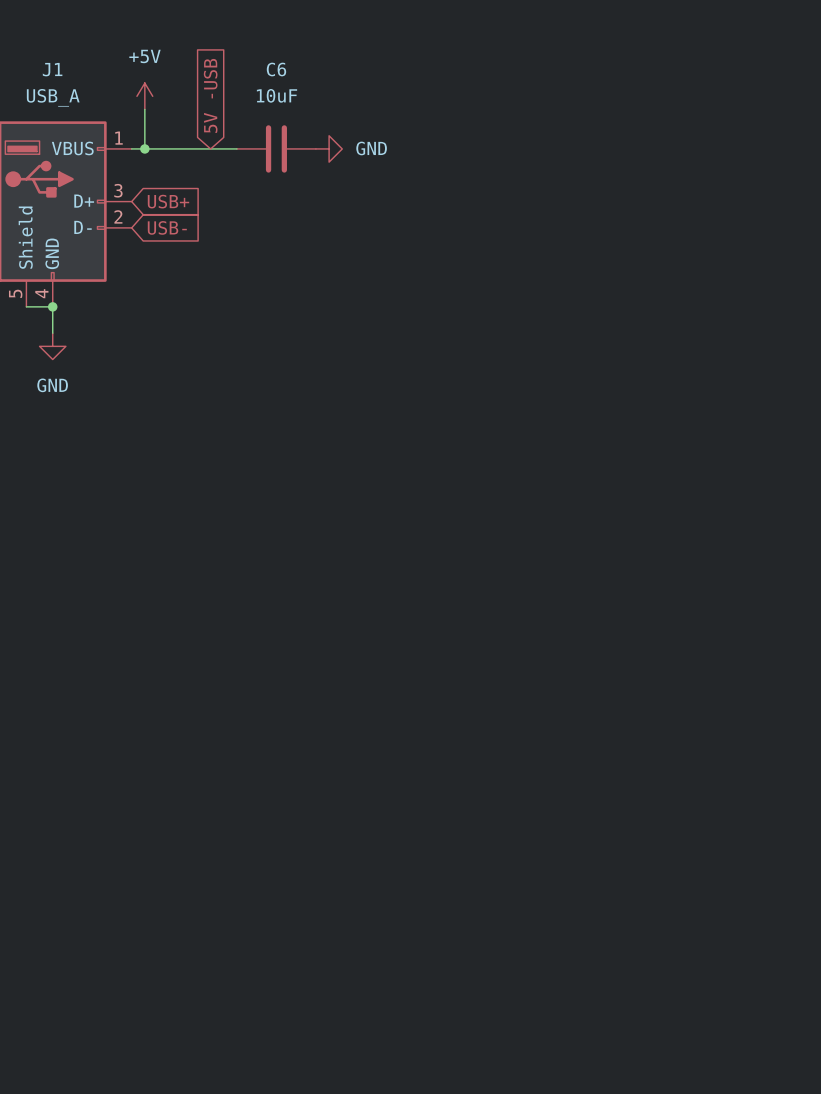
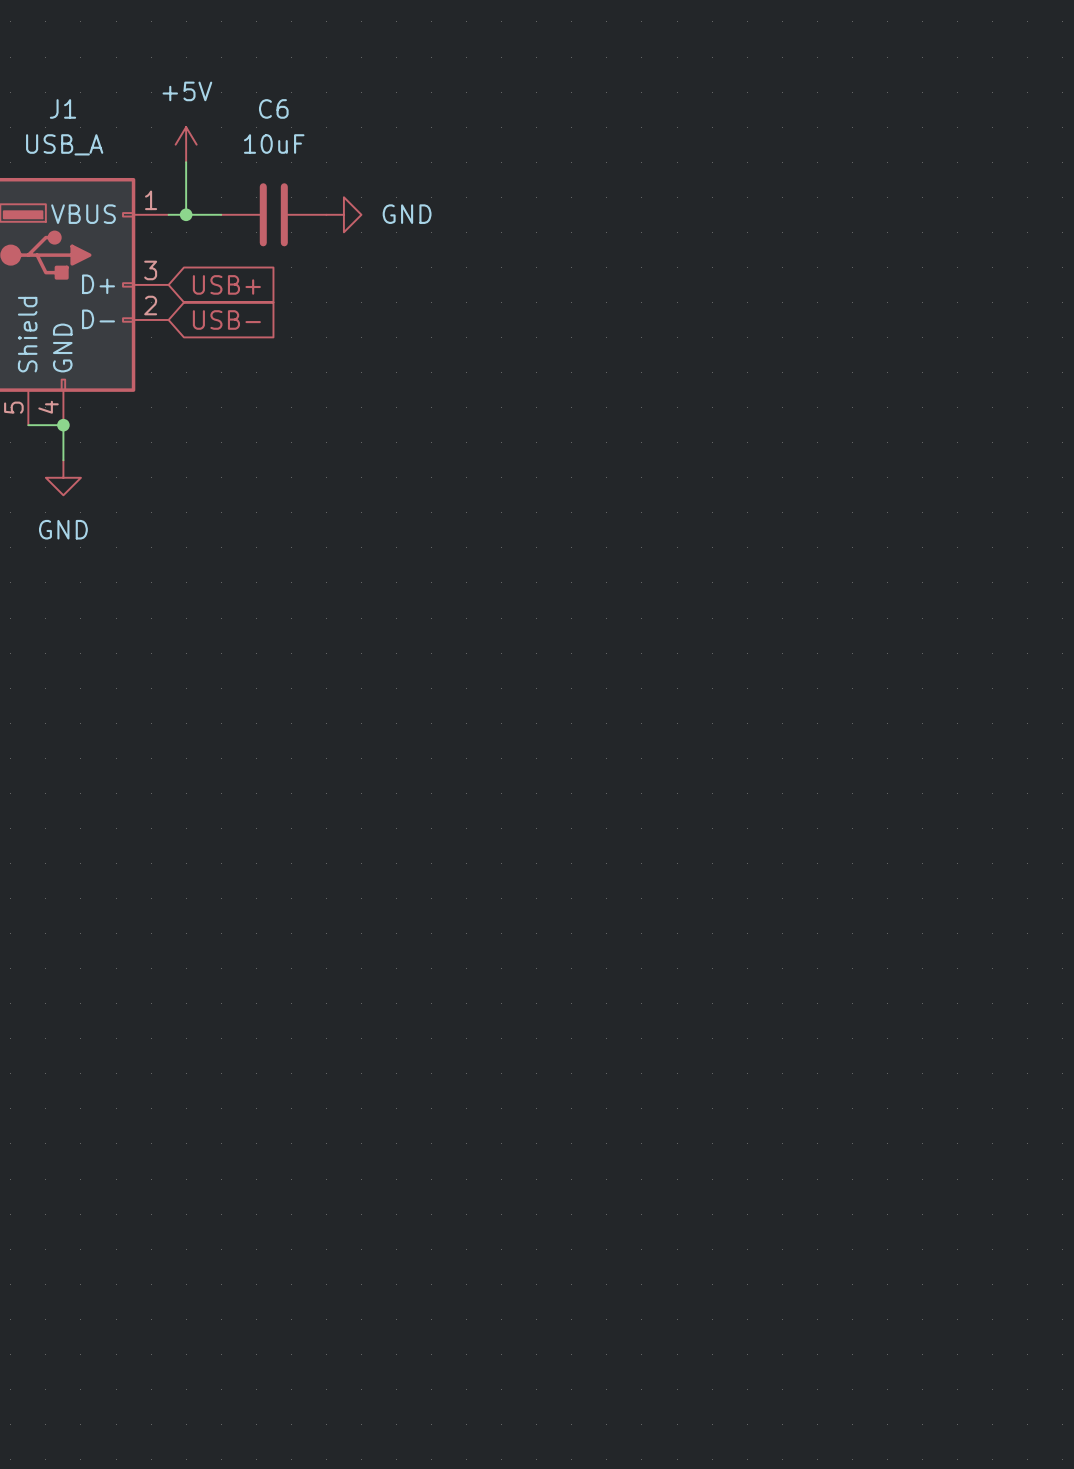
global label: 5V -USB (210, 95) -> none
C6 position: (276, 148) -> (273, 214)
power symbol position: GND (329, 148) -> GND (343, 214)

